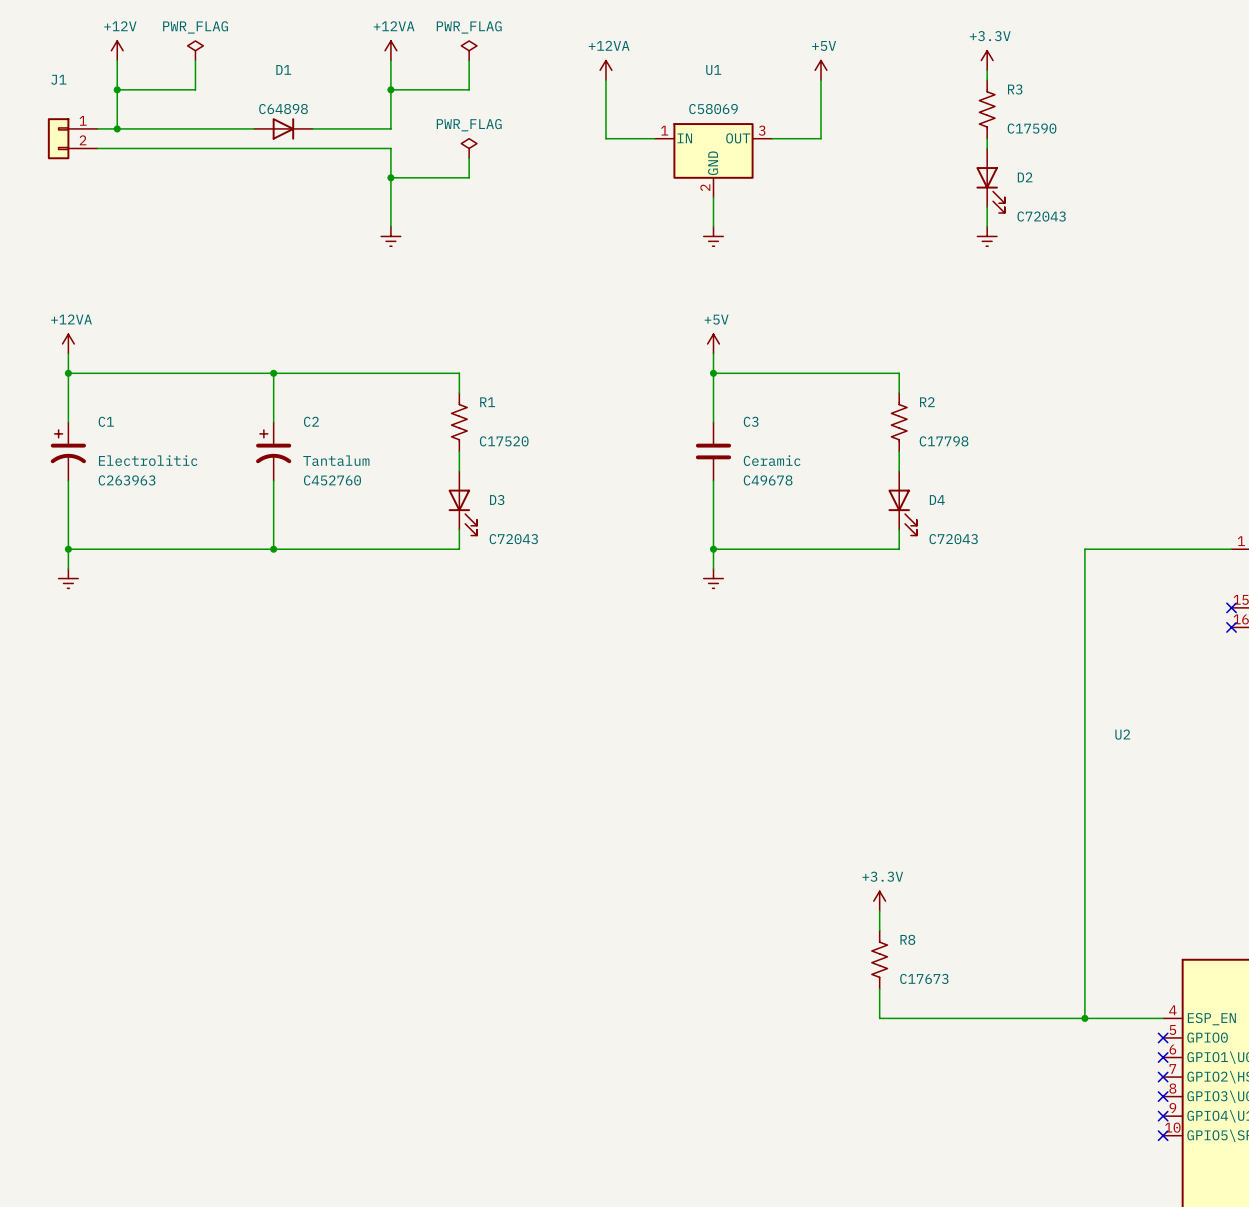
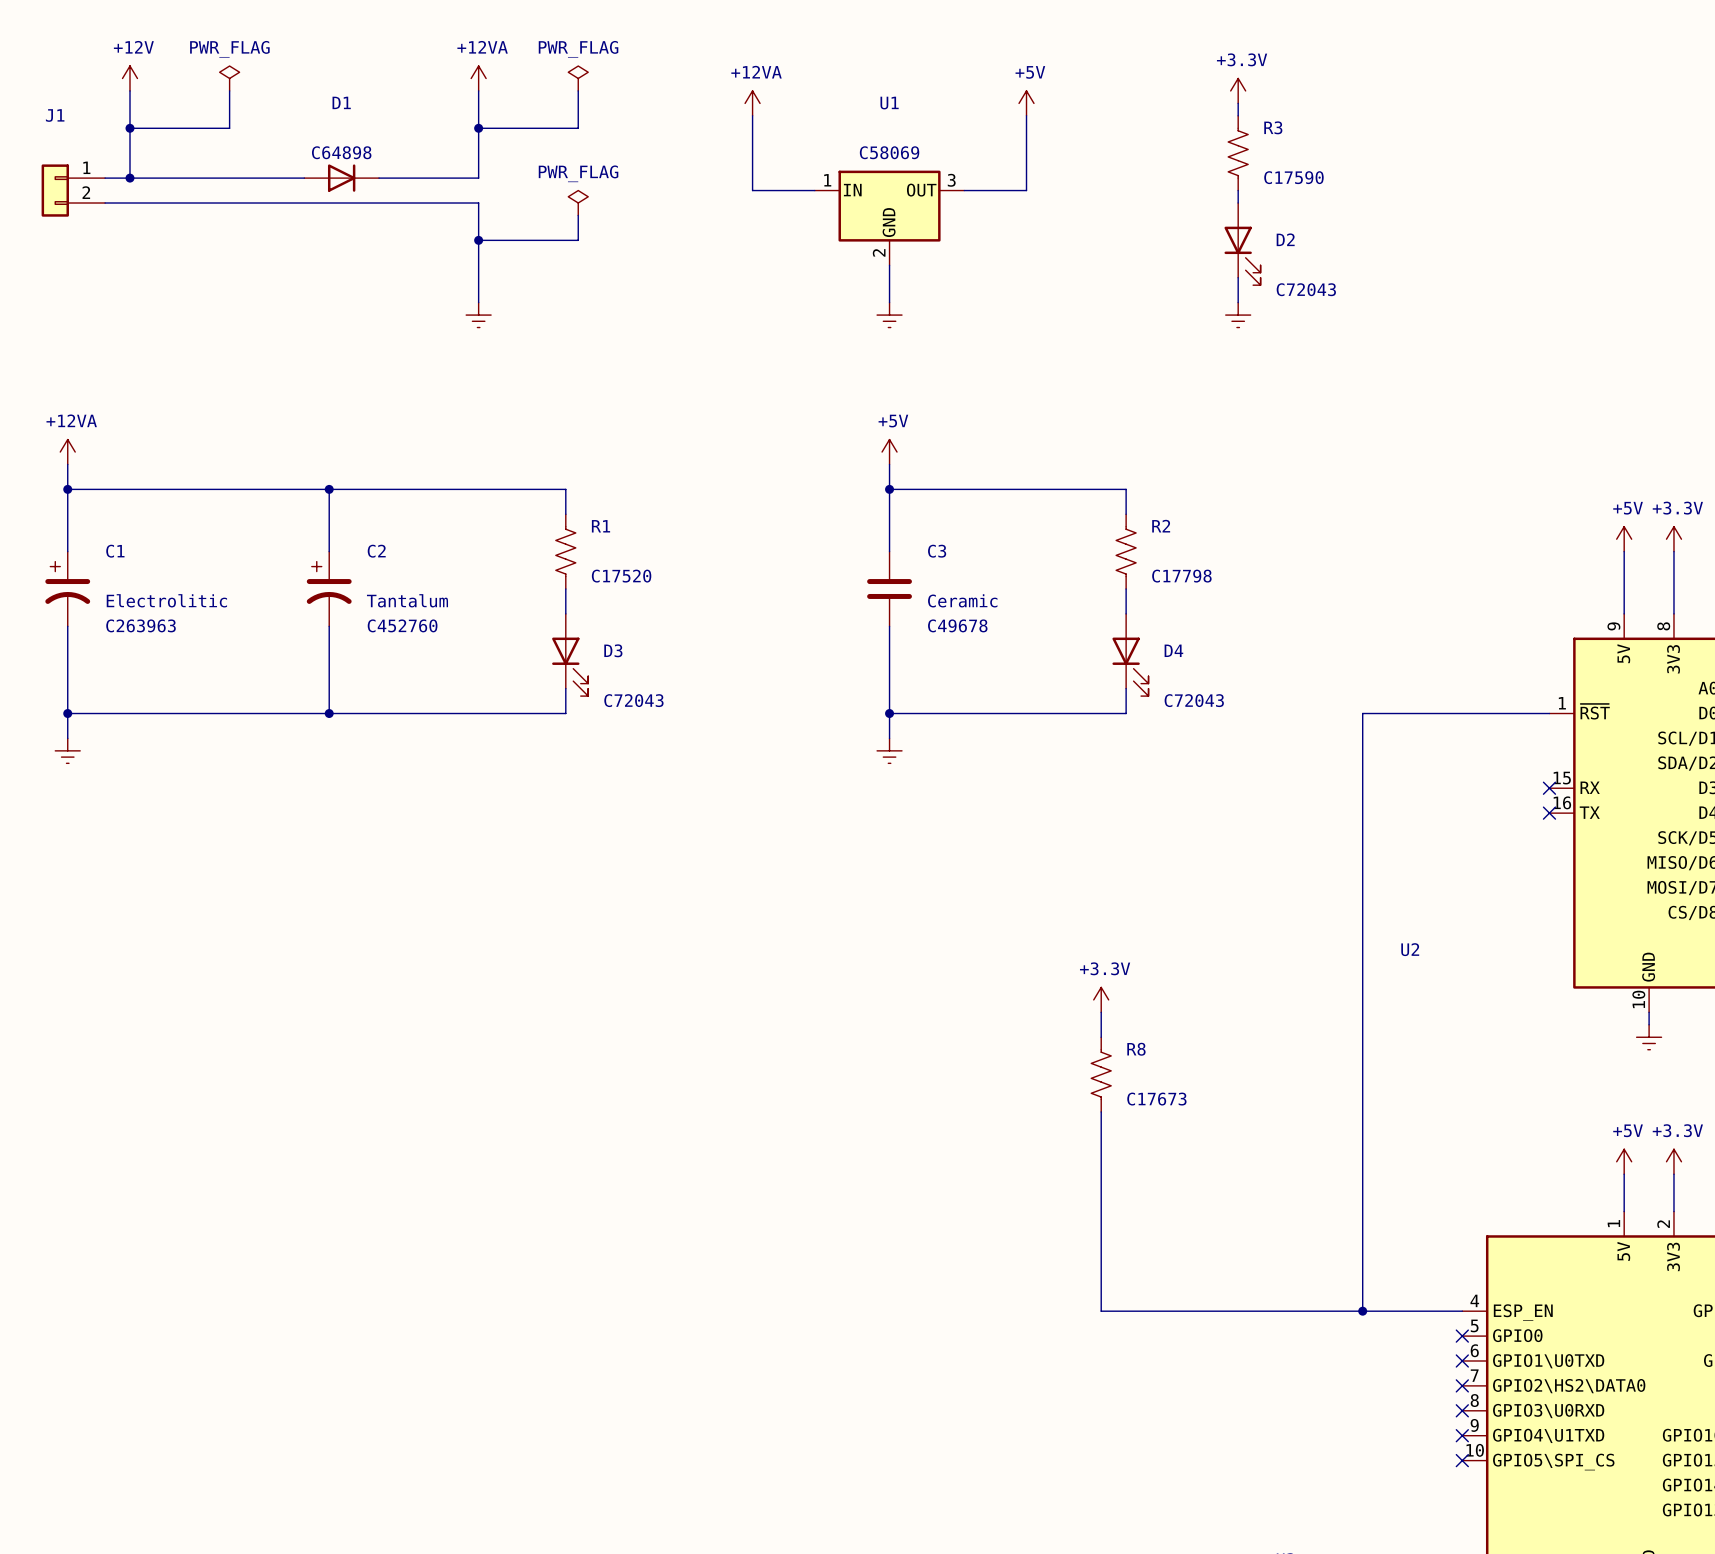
wire: none -> (1101, 1012) (1101, 1037)
wire: none -> (1101, 1111) (1101, 1174)
power symbol position: +3.3V (879, 901) -> +3.3V (1101, 999)
R8 position: (879, 959) -> (1101, 1074)

